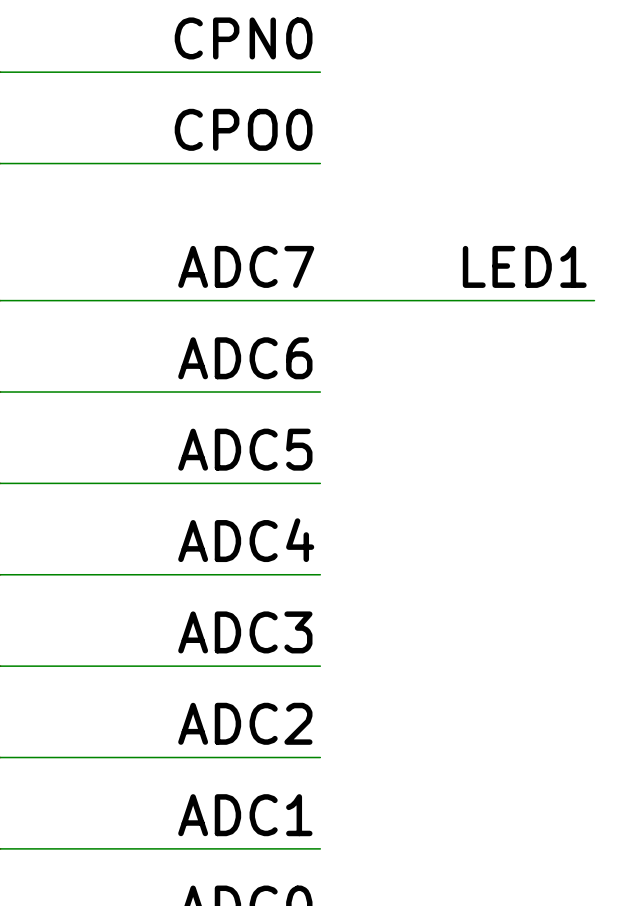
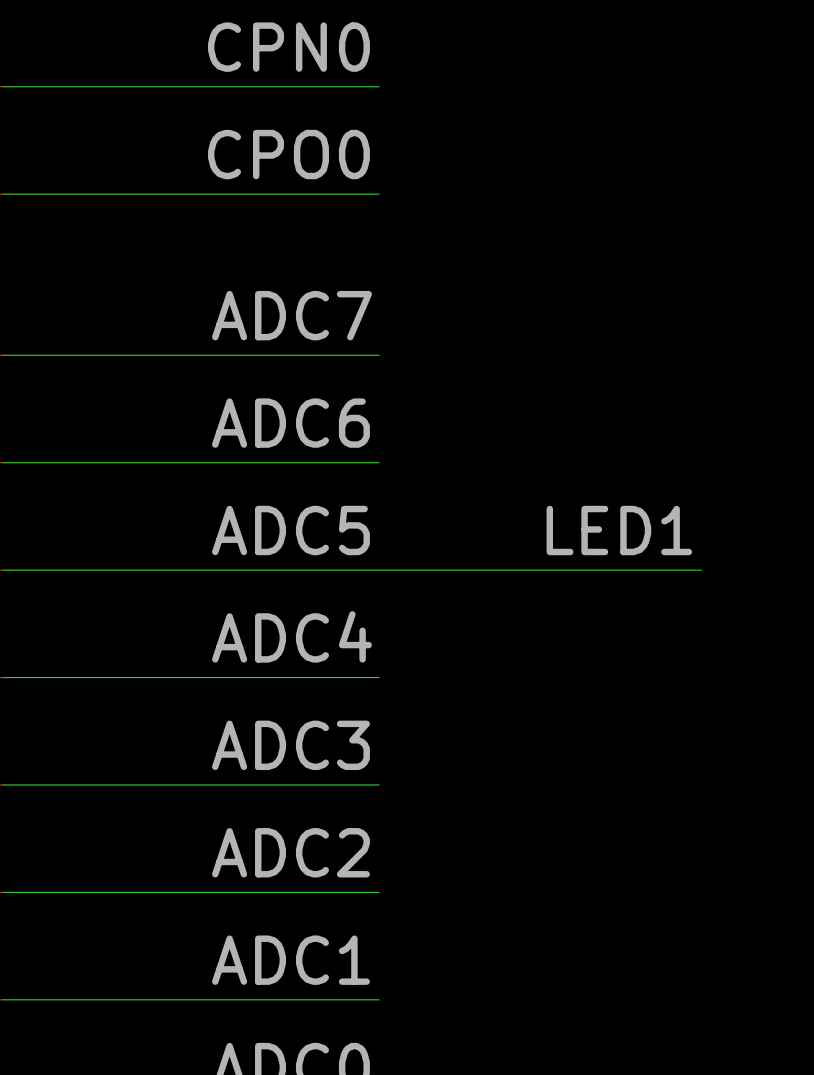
label position: LED1 (524, 266) -> LED1 (619, 530)
wire: (320, 300) (594, 300) -> (379, 570) (701, 570)

